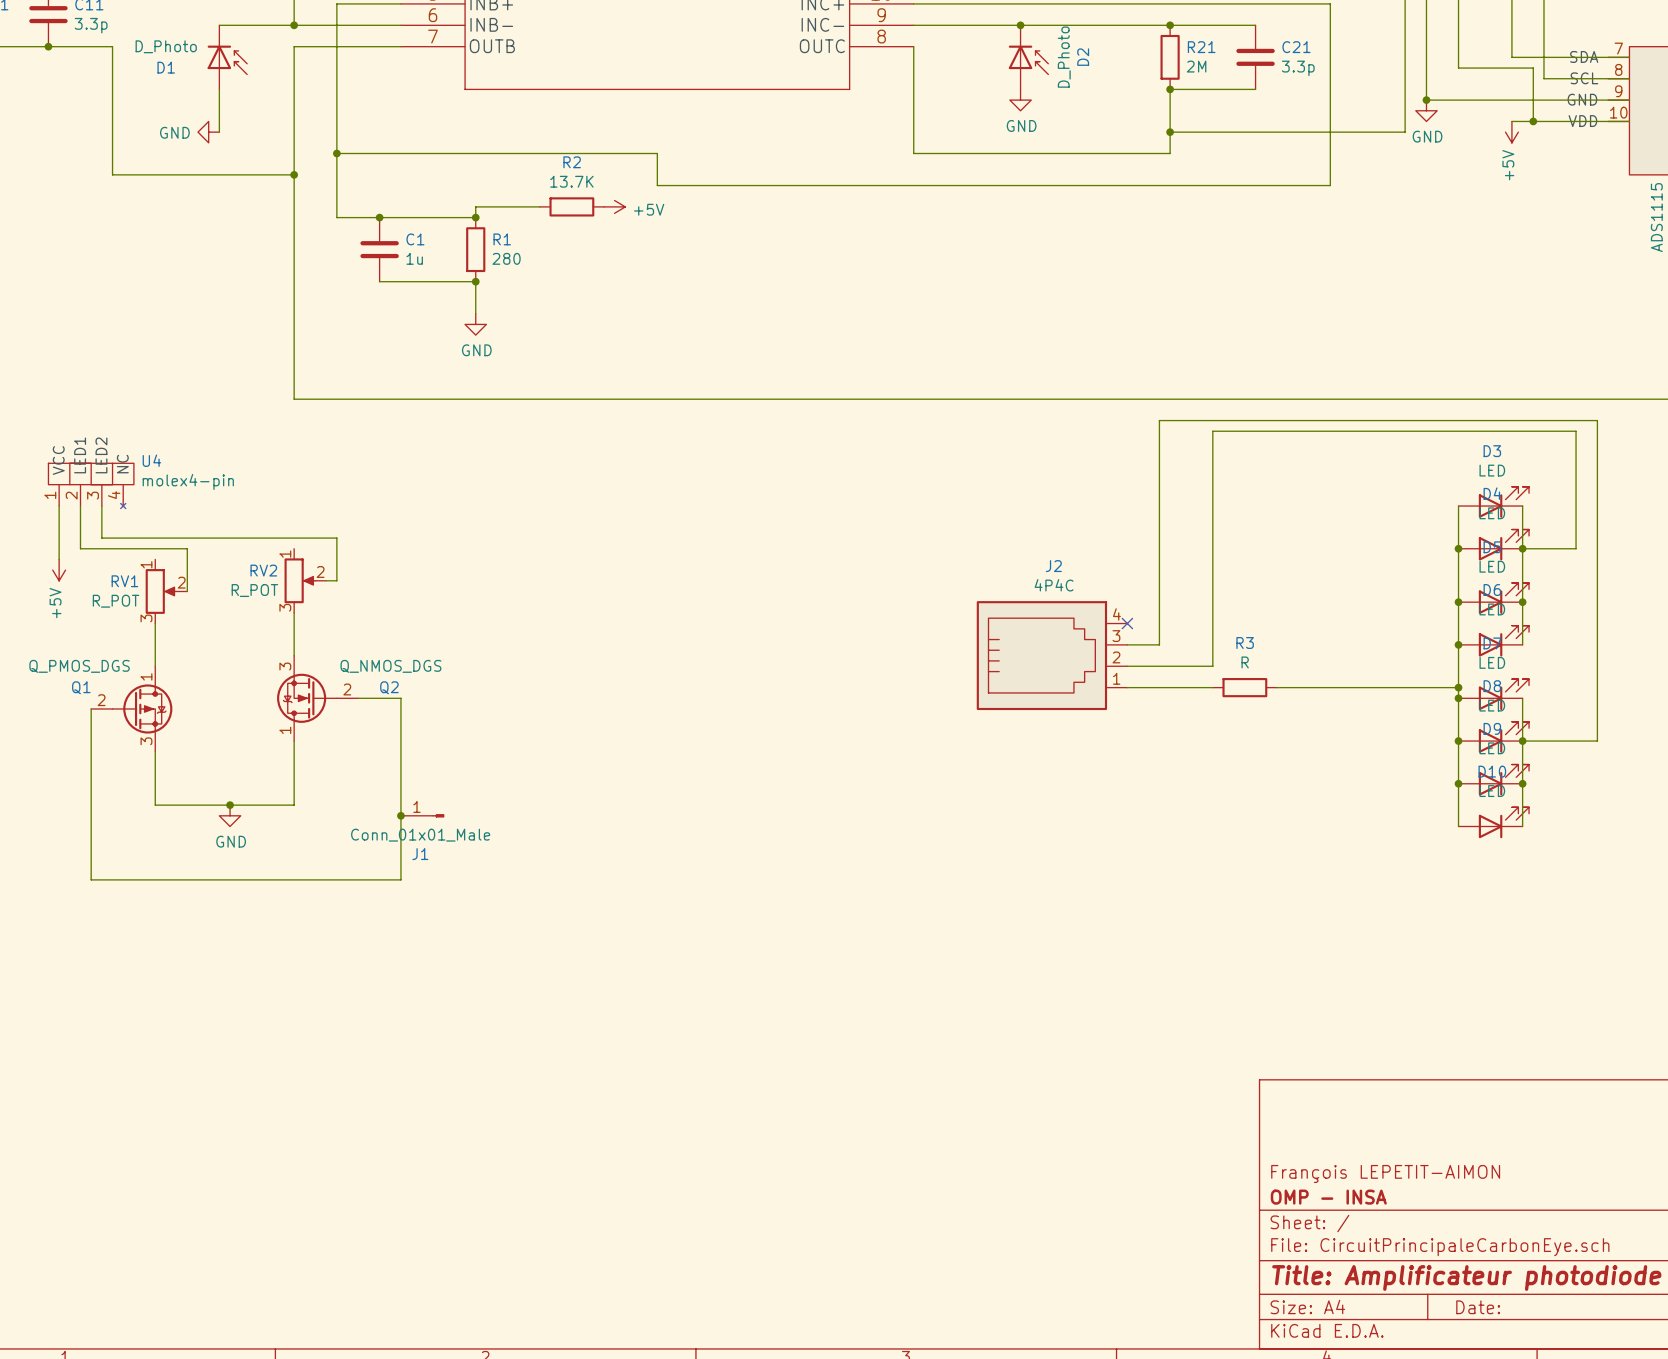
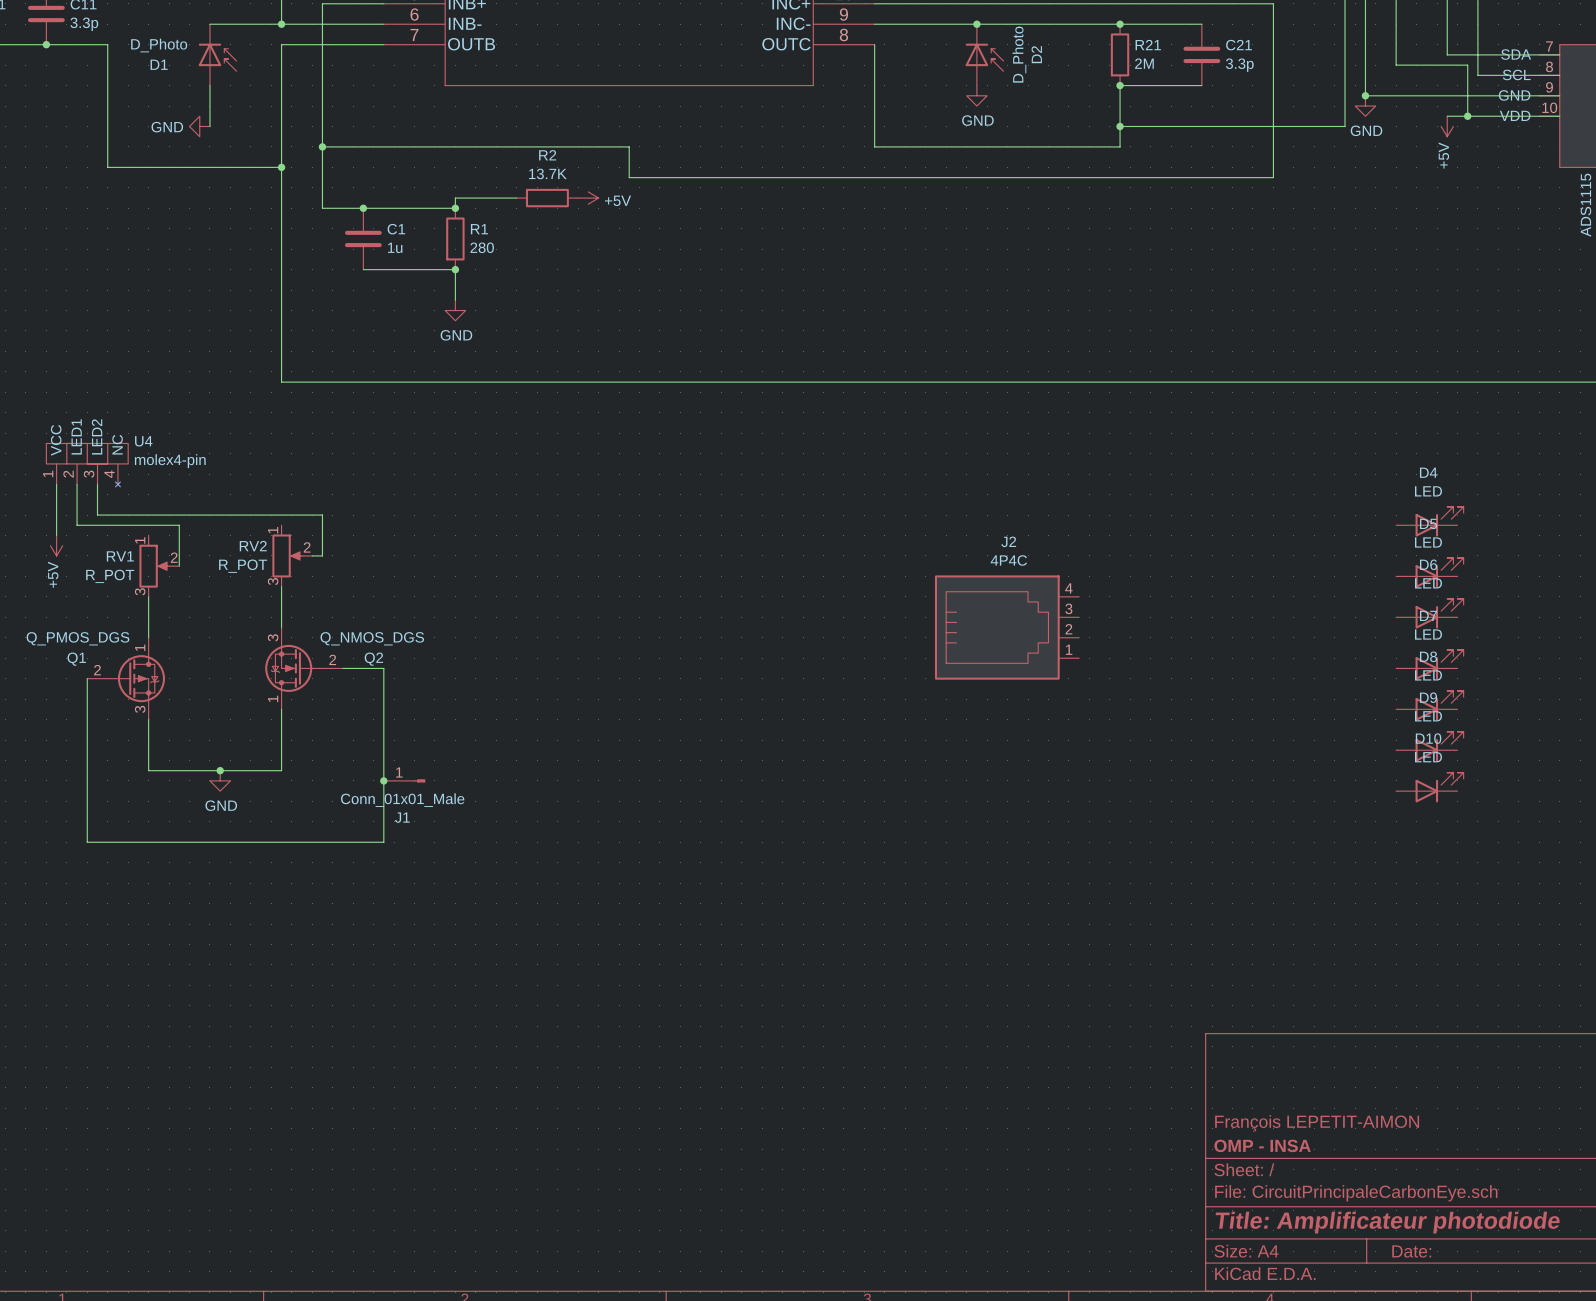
D3: LED (1493, 502) -> none
wire: (1458, 506) (1458, 826) -> none
wire: (1522, 506) (1522, 644) -> none
junction: (1458, 548) -> none
wire: (1522, 548) (1576, 548) (1576, 431) (1212, 431) (1212, 666) (1127, 666) -> none
junction: (1522, 548) -> none
junction: (1458, 602) -> none
junction: (1522, 602) -> none
no-connect mark: (1127, 623) -> none
wire: (1127, 644) (1159, 644) (1159, 420) (1597, 420) (1597, 741) (1522, 741) -> none
junction: (1458, 644) -> none
wire: (1127, 687) (1212, 687) -> none
R3: R (1244, 687) -> none
wire: (1276, 687) (1458, 687) -> none
junction: (1458, 687) -> none
junction: (1458, 698) -> none
wire: (1522, 698) (1522, 826) -> none
junction: (1458, 741) -> none
junction: (1522, 741) -> none
junction: (1458, 783) -> none
junction: (1522, 783) -> none

